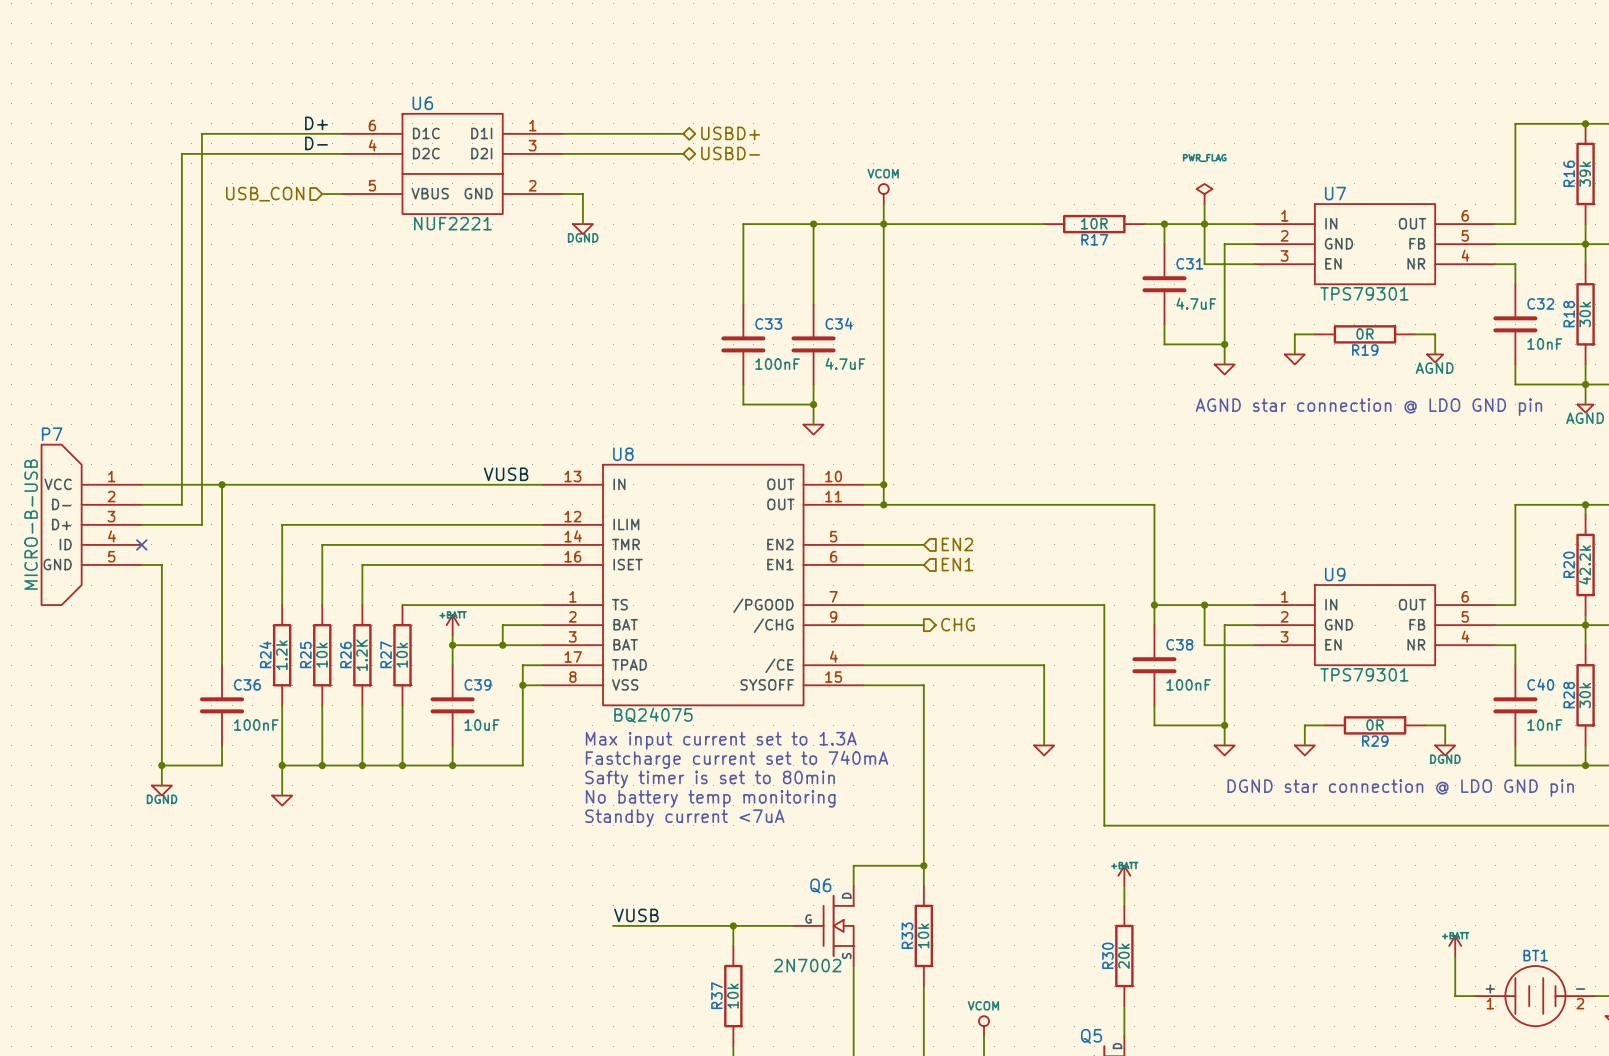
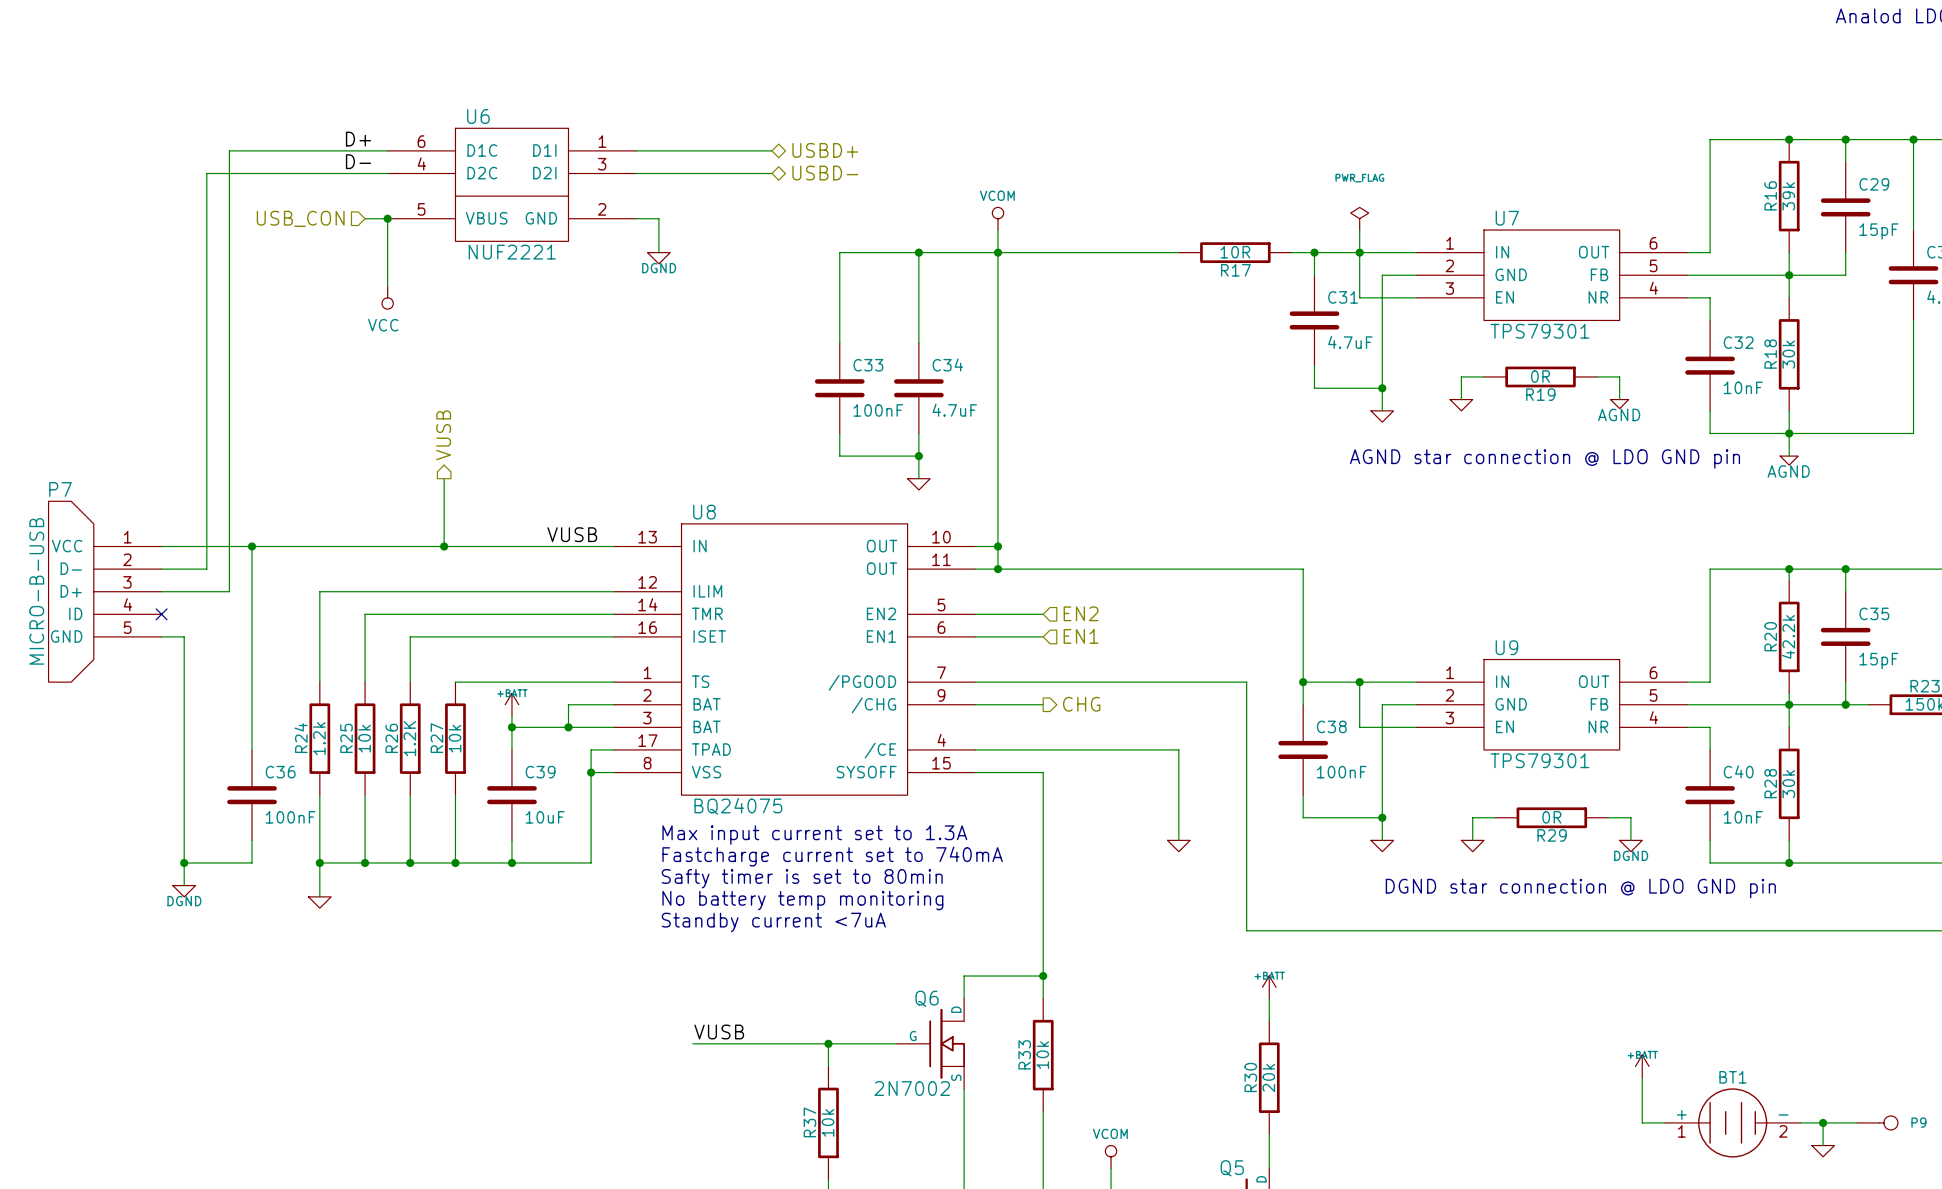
wire: none -> (387, 218) (387, 286)
junction: none -> (387, 218)
power symbol: none -> VCC (387, 297)
hierarchical label: none -> VUSB (443, 435)
wire: none -> (444, 478) (444, 546)
junction: none -> (444, 546)

